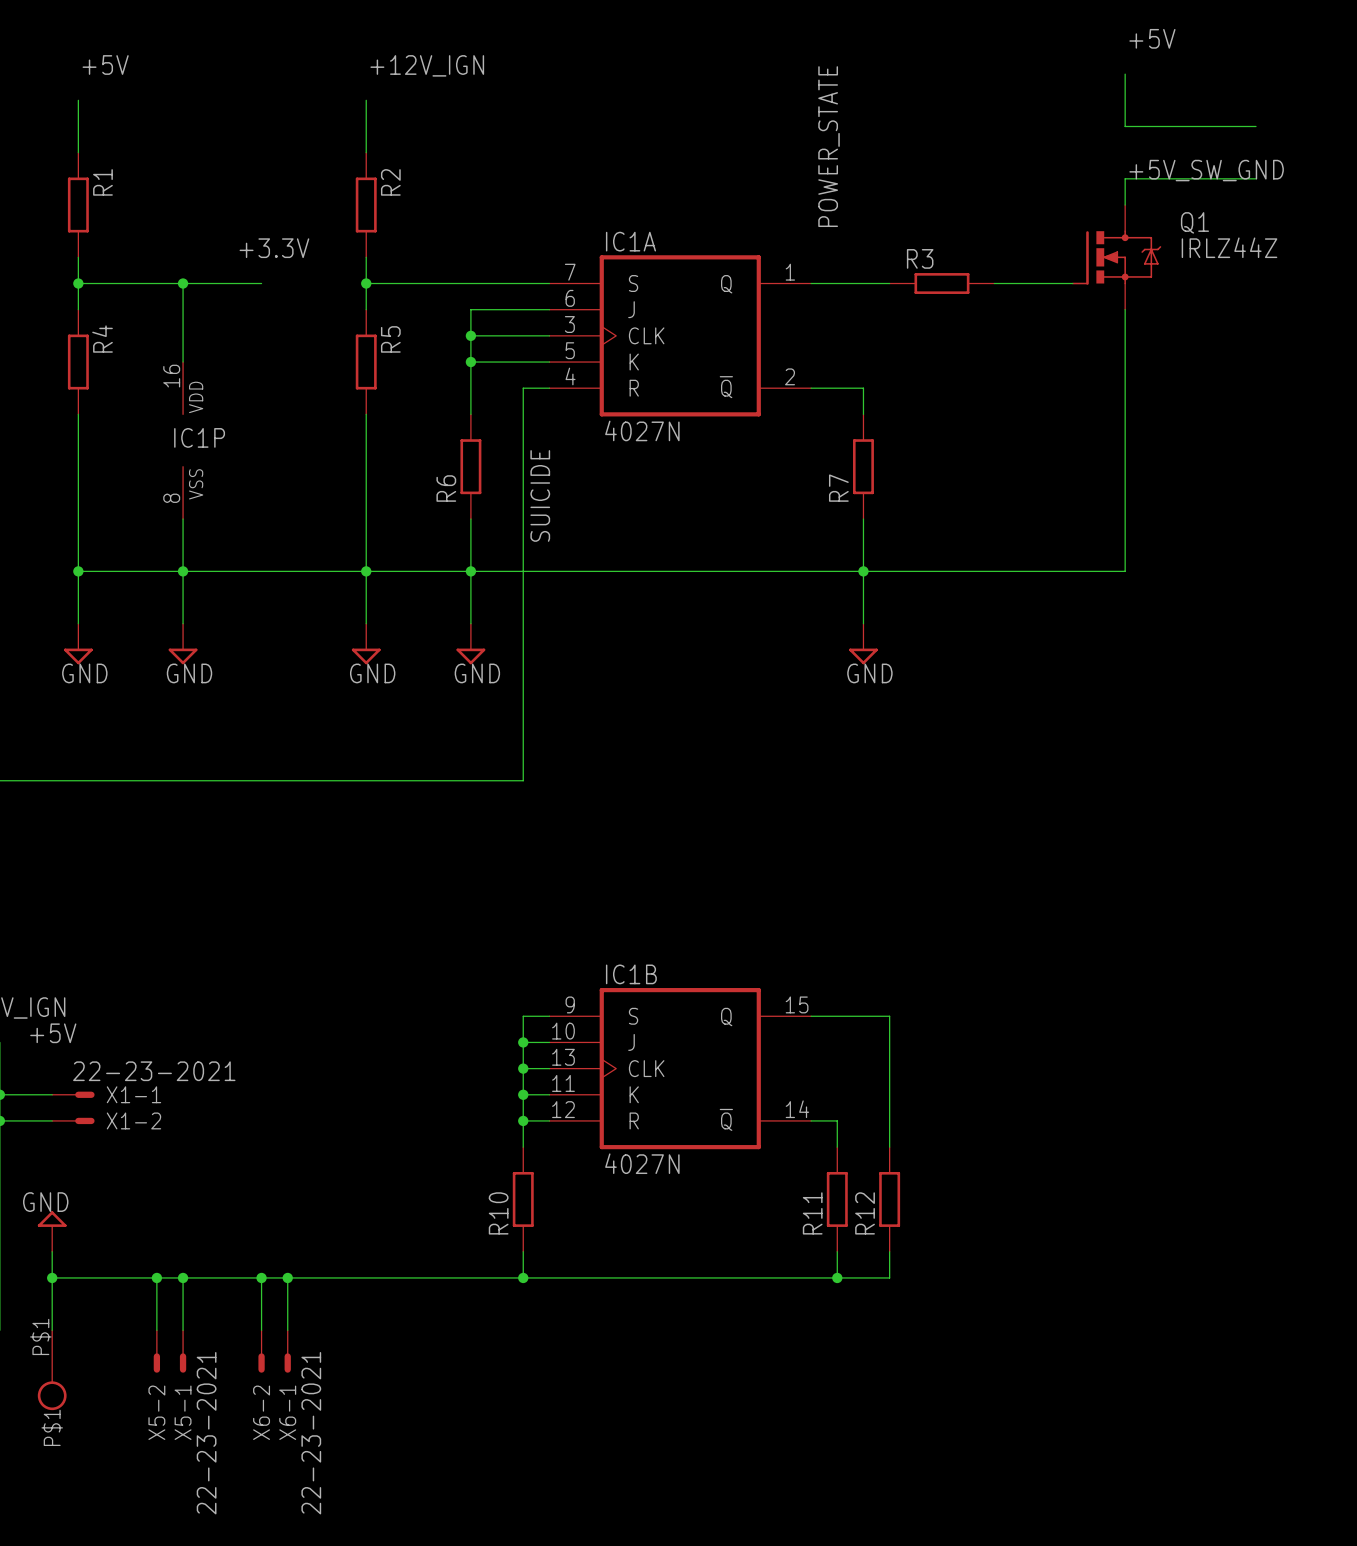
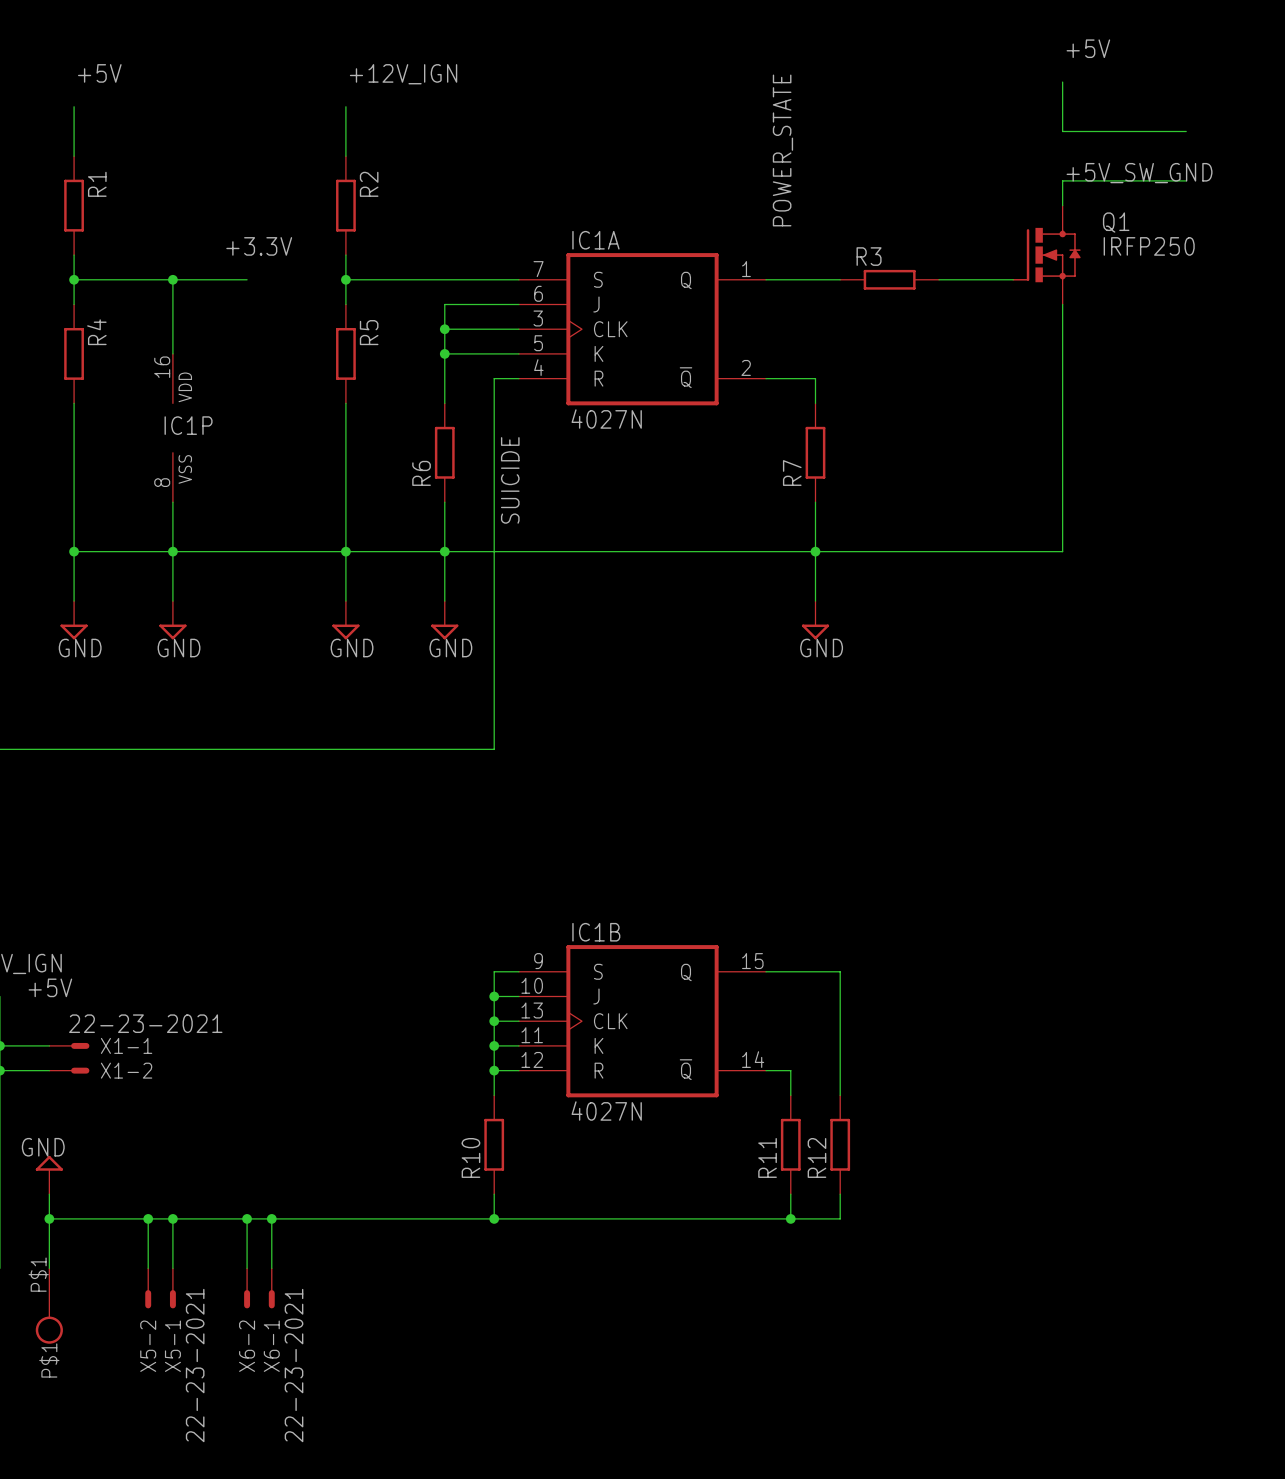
Q1 symbol: [1072, 205, 1162, 310] -> [1012, 205, 1081, 305]
Q1 value: IRLZ44Z (1229, 247) -> IRFP250 (1149, 246)

